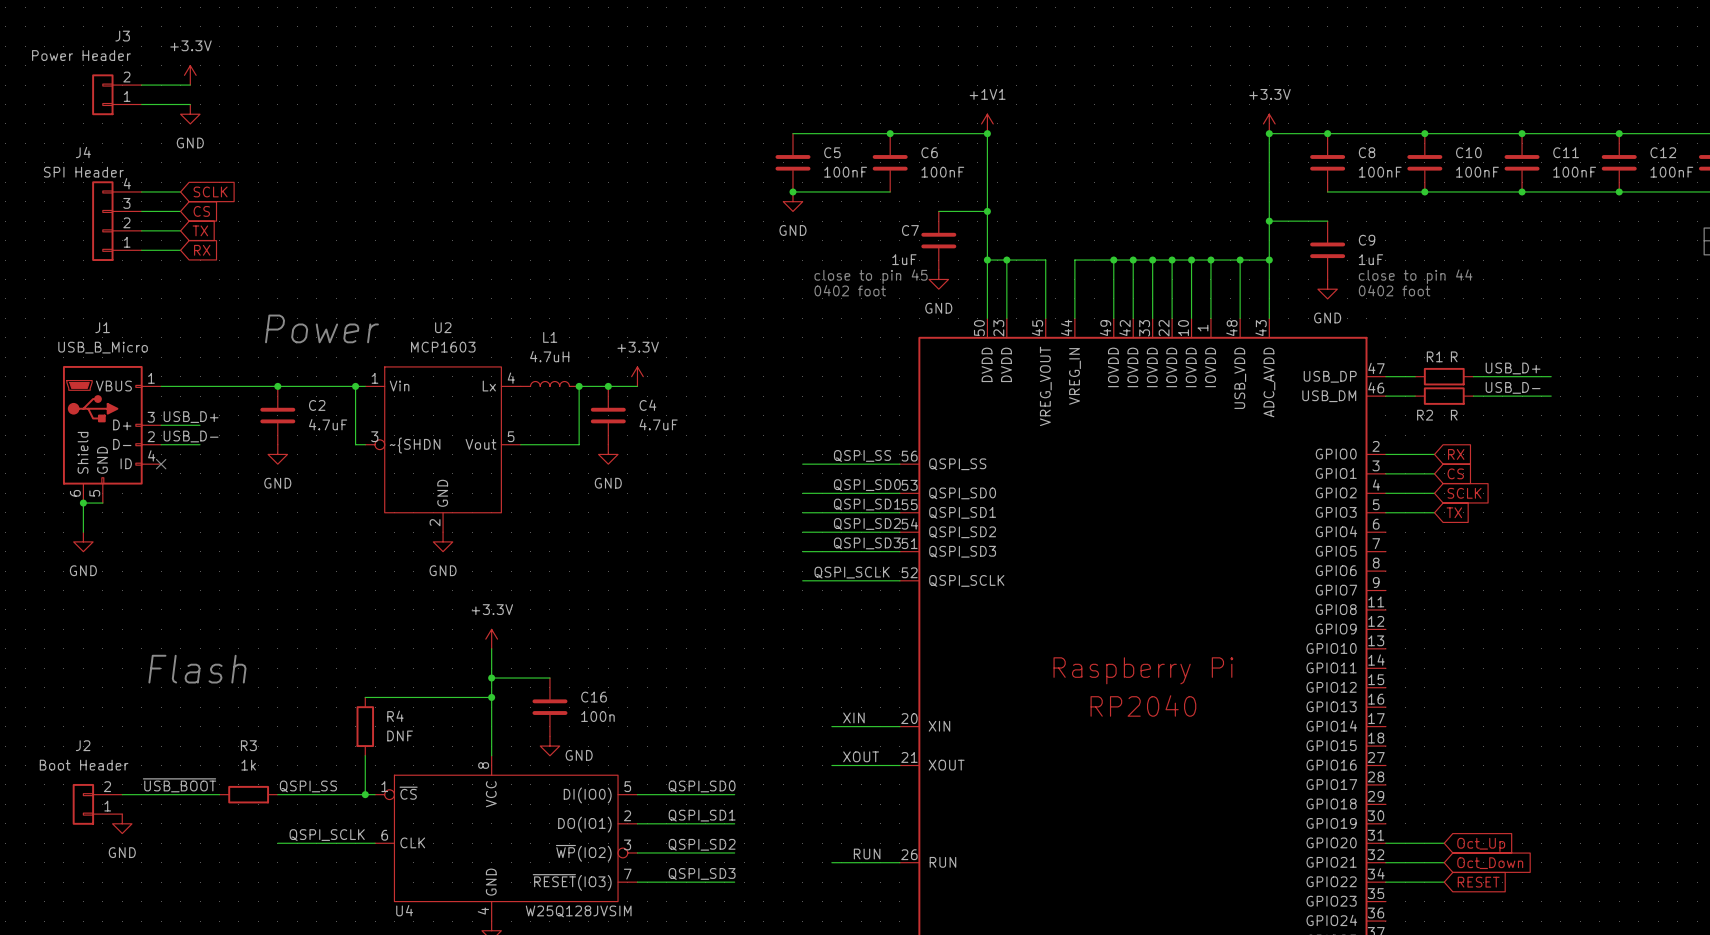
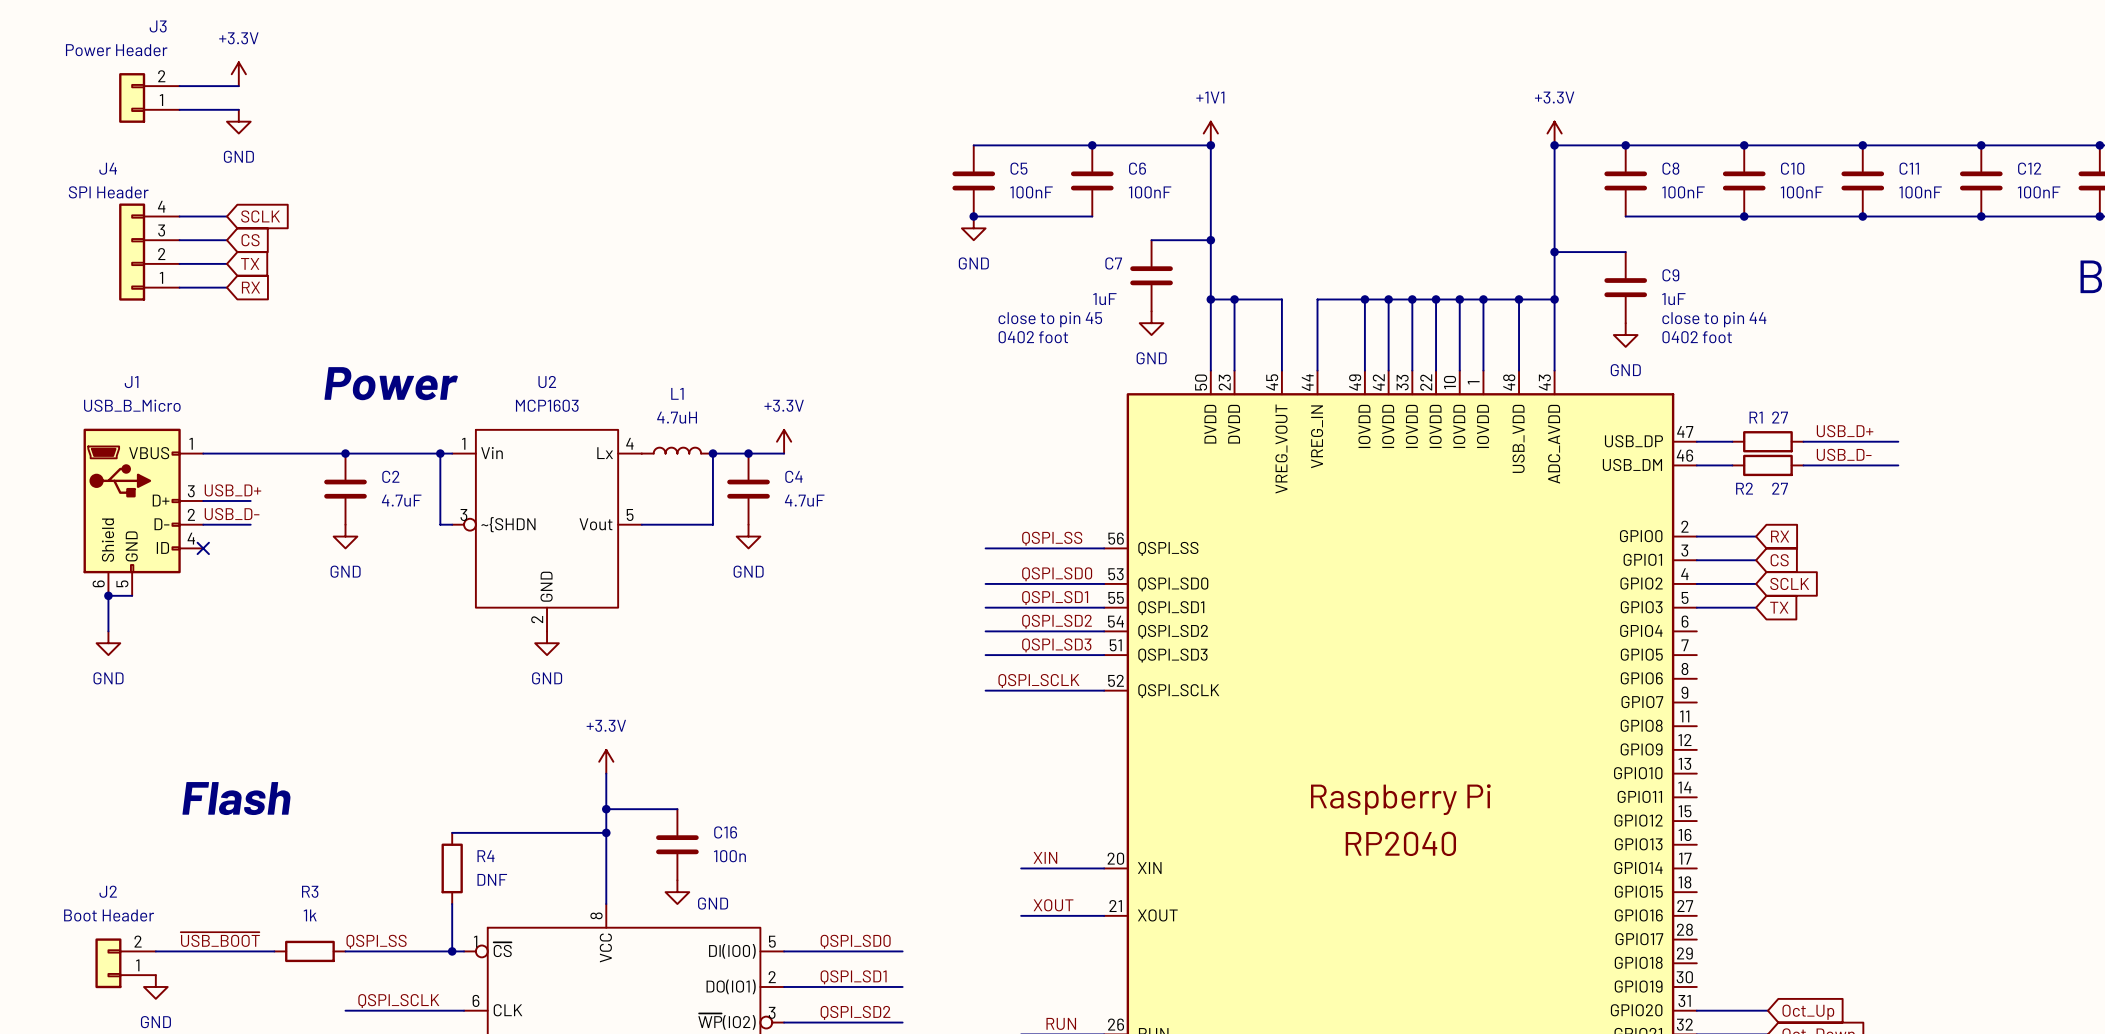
R1 value: R (1454, 356) -> 27 (1780, 417)
R2 value: R (1454, 415) -> 27 (1780, 488)

